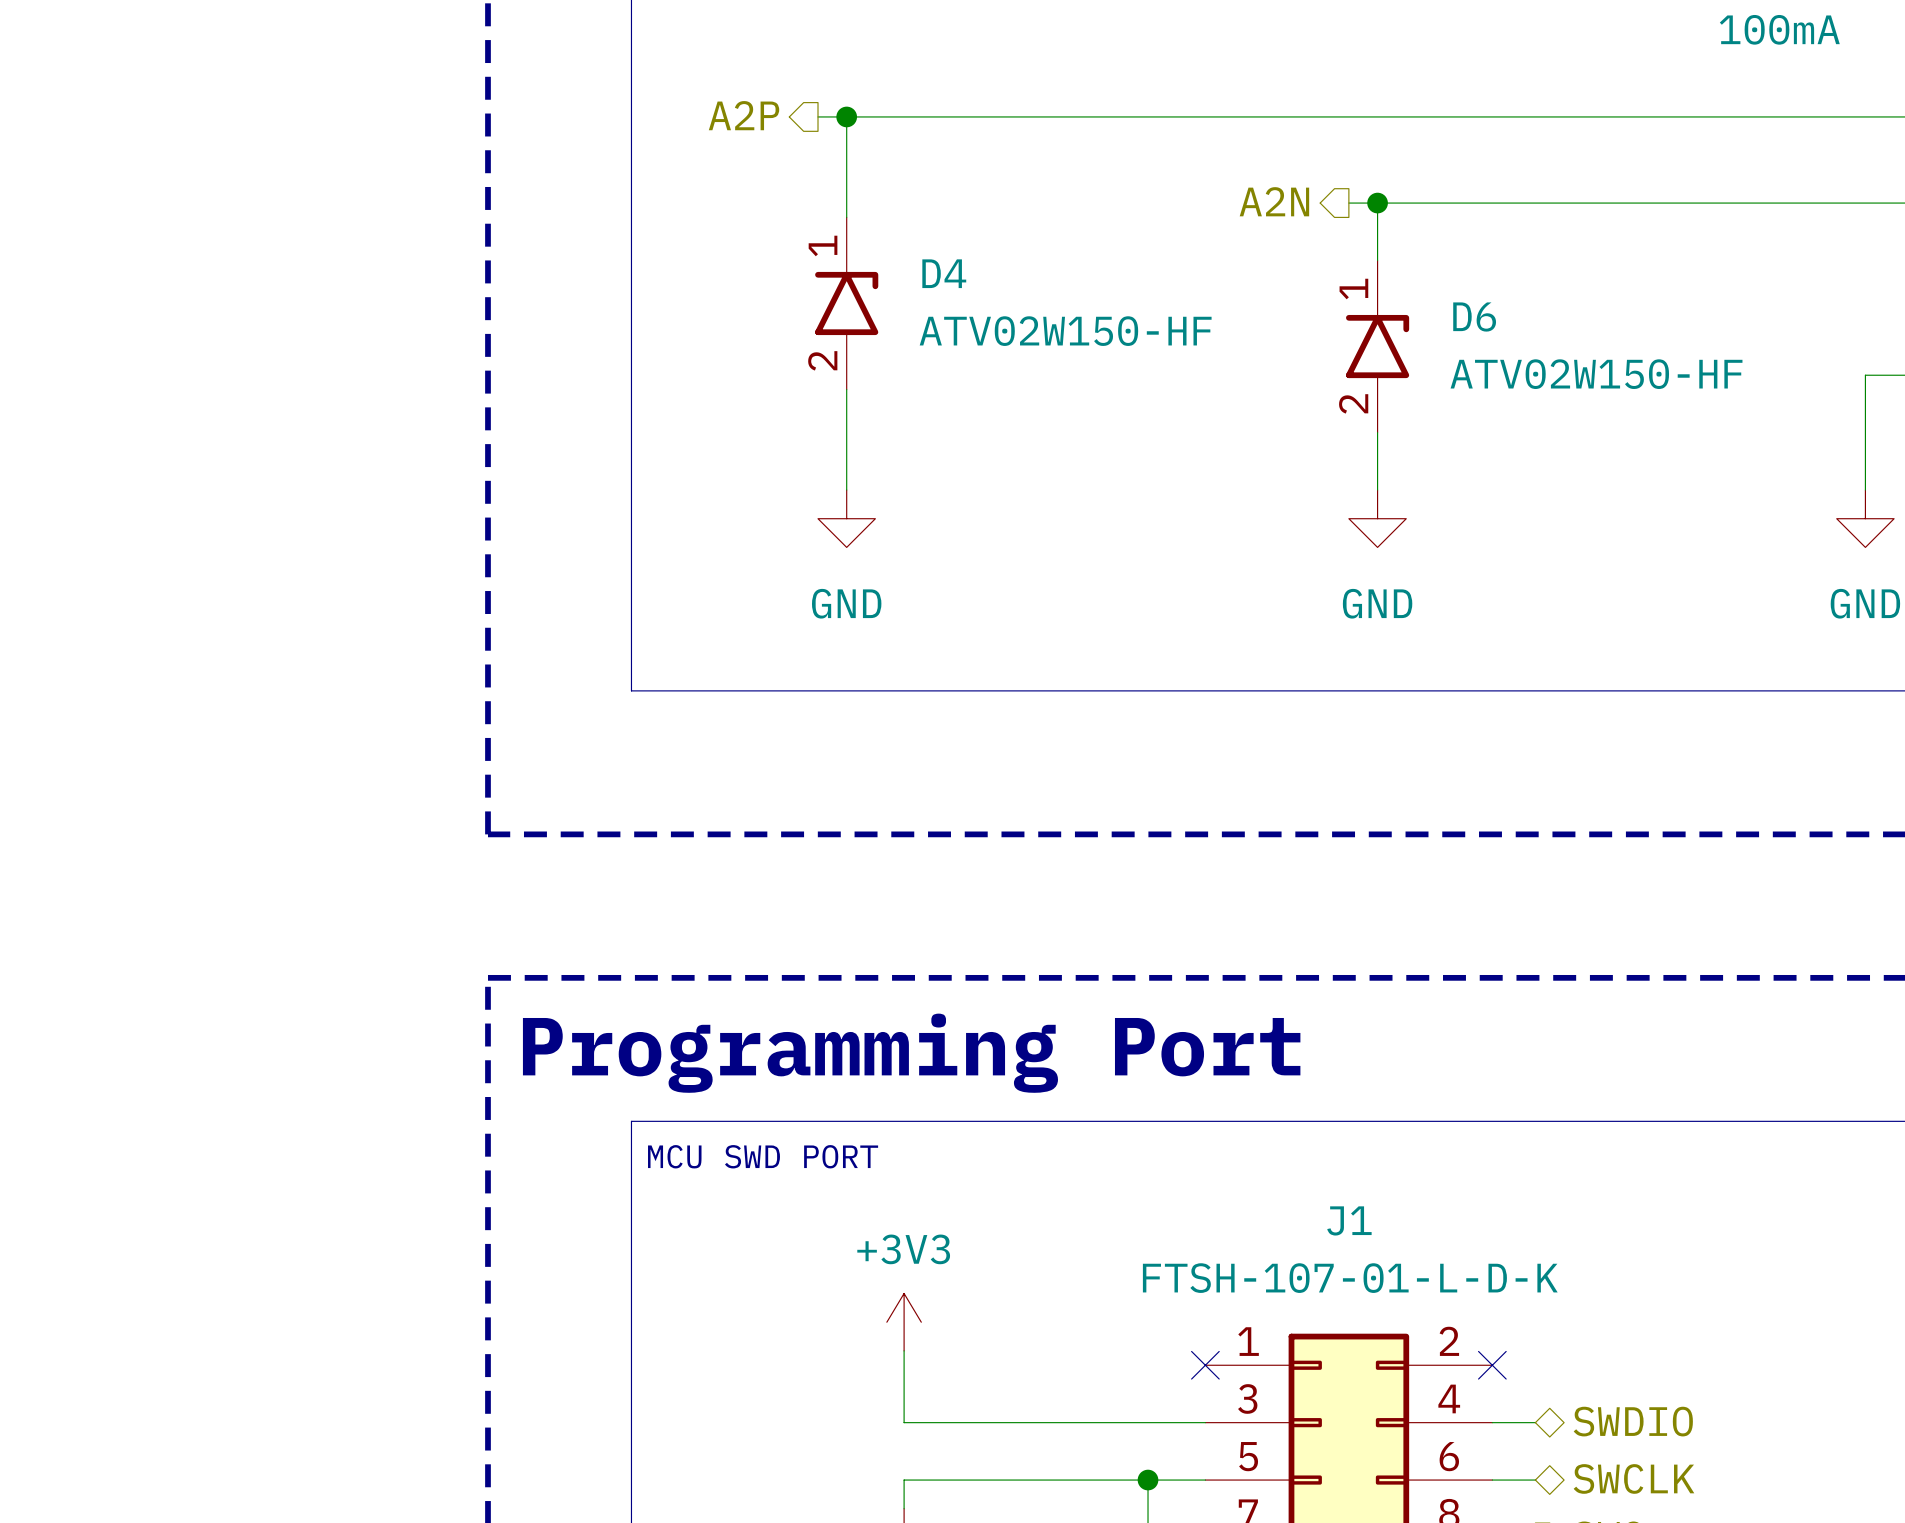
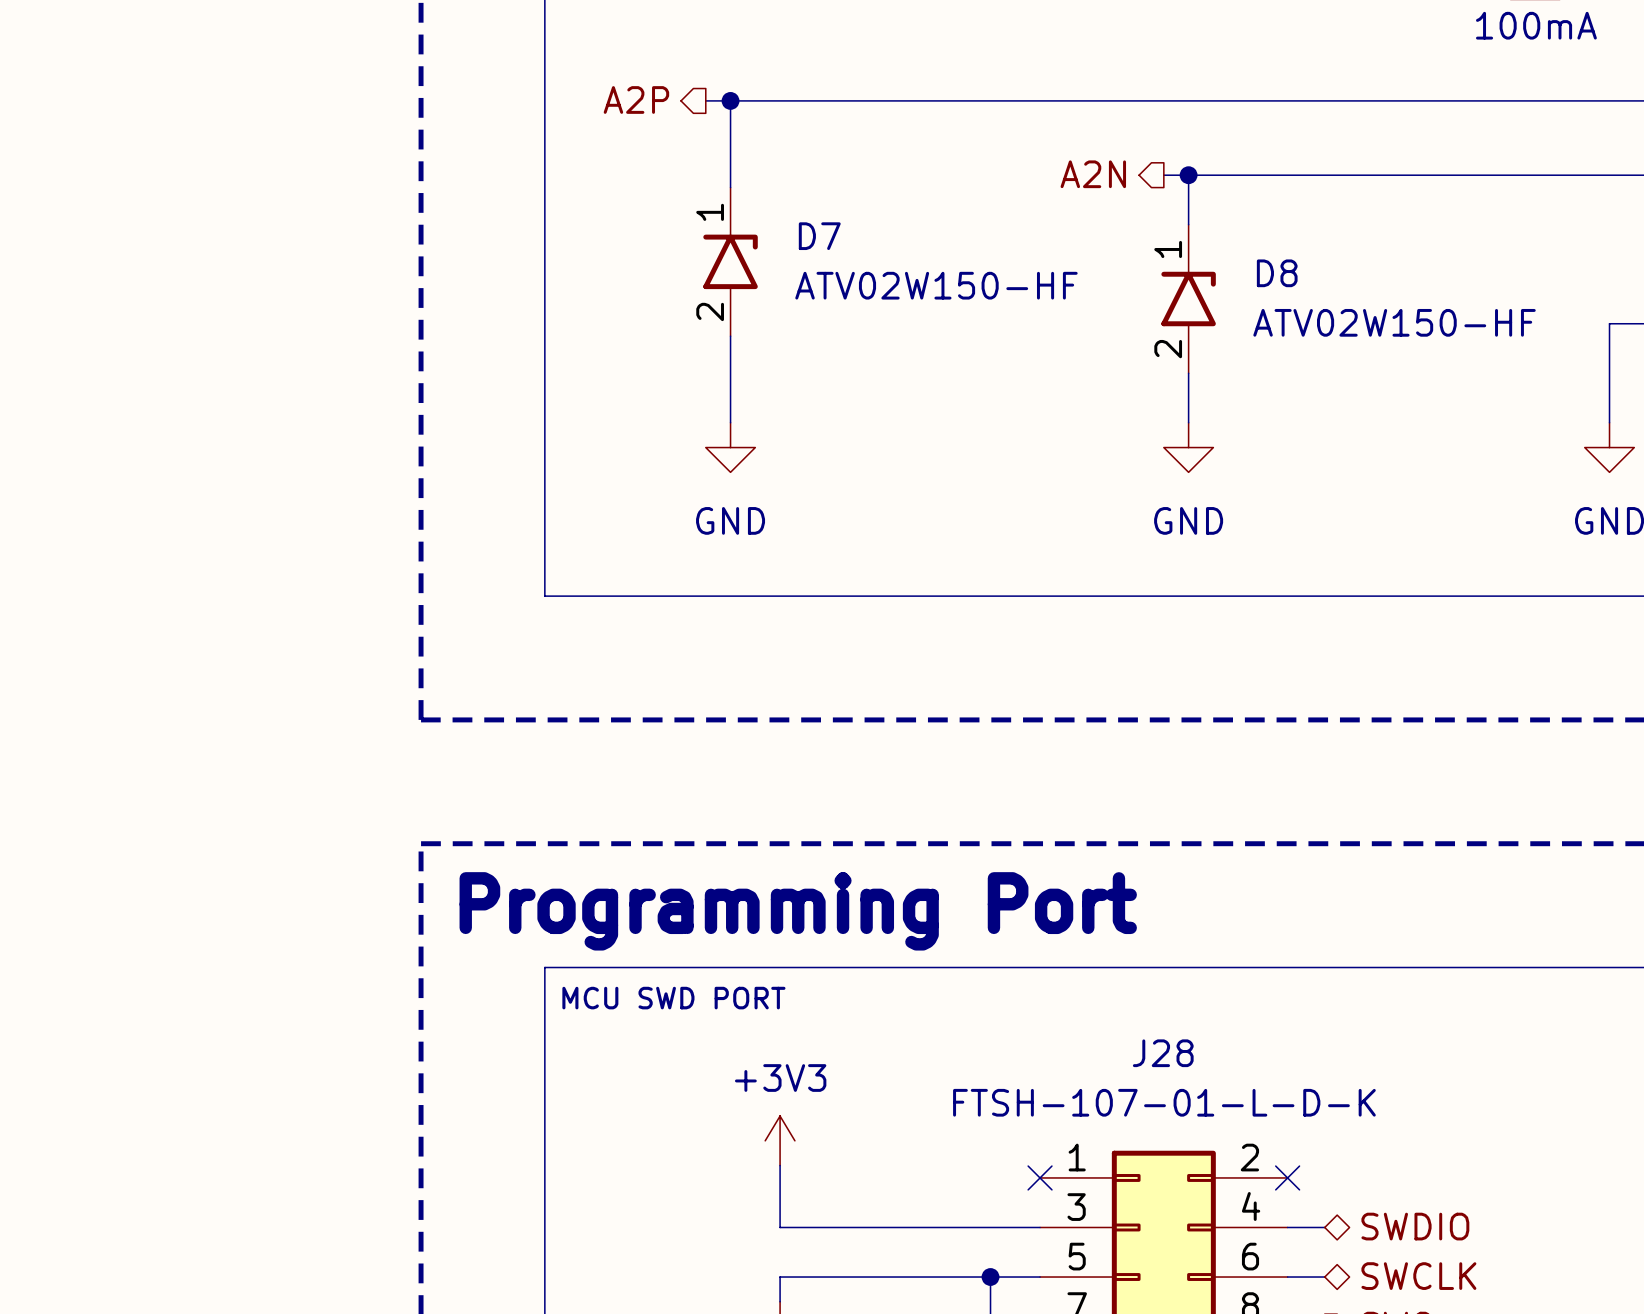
D4 name: D4 (944, 273) -> D7 (819, 236)
D6 name: D6 (1474, 317) -> D8 (1277, 273)
J1 name: J1 (1349, 1220) -> J28 (1163, 1053)

